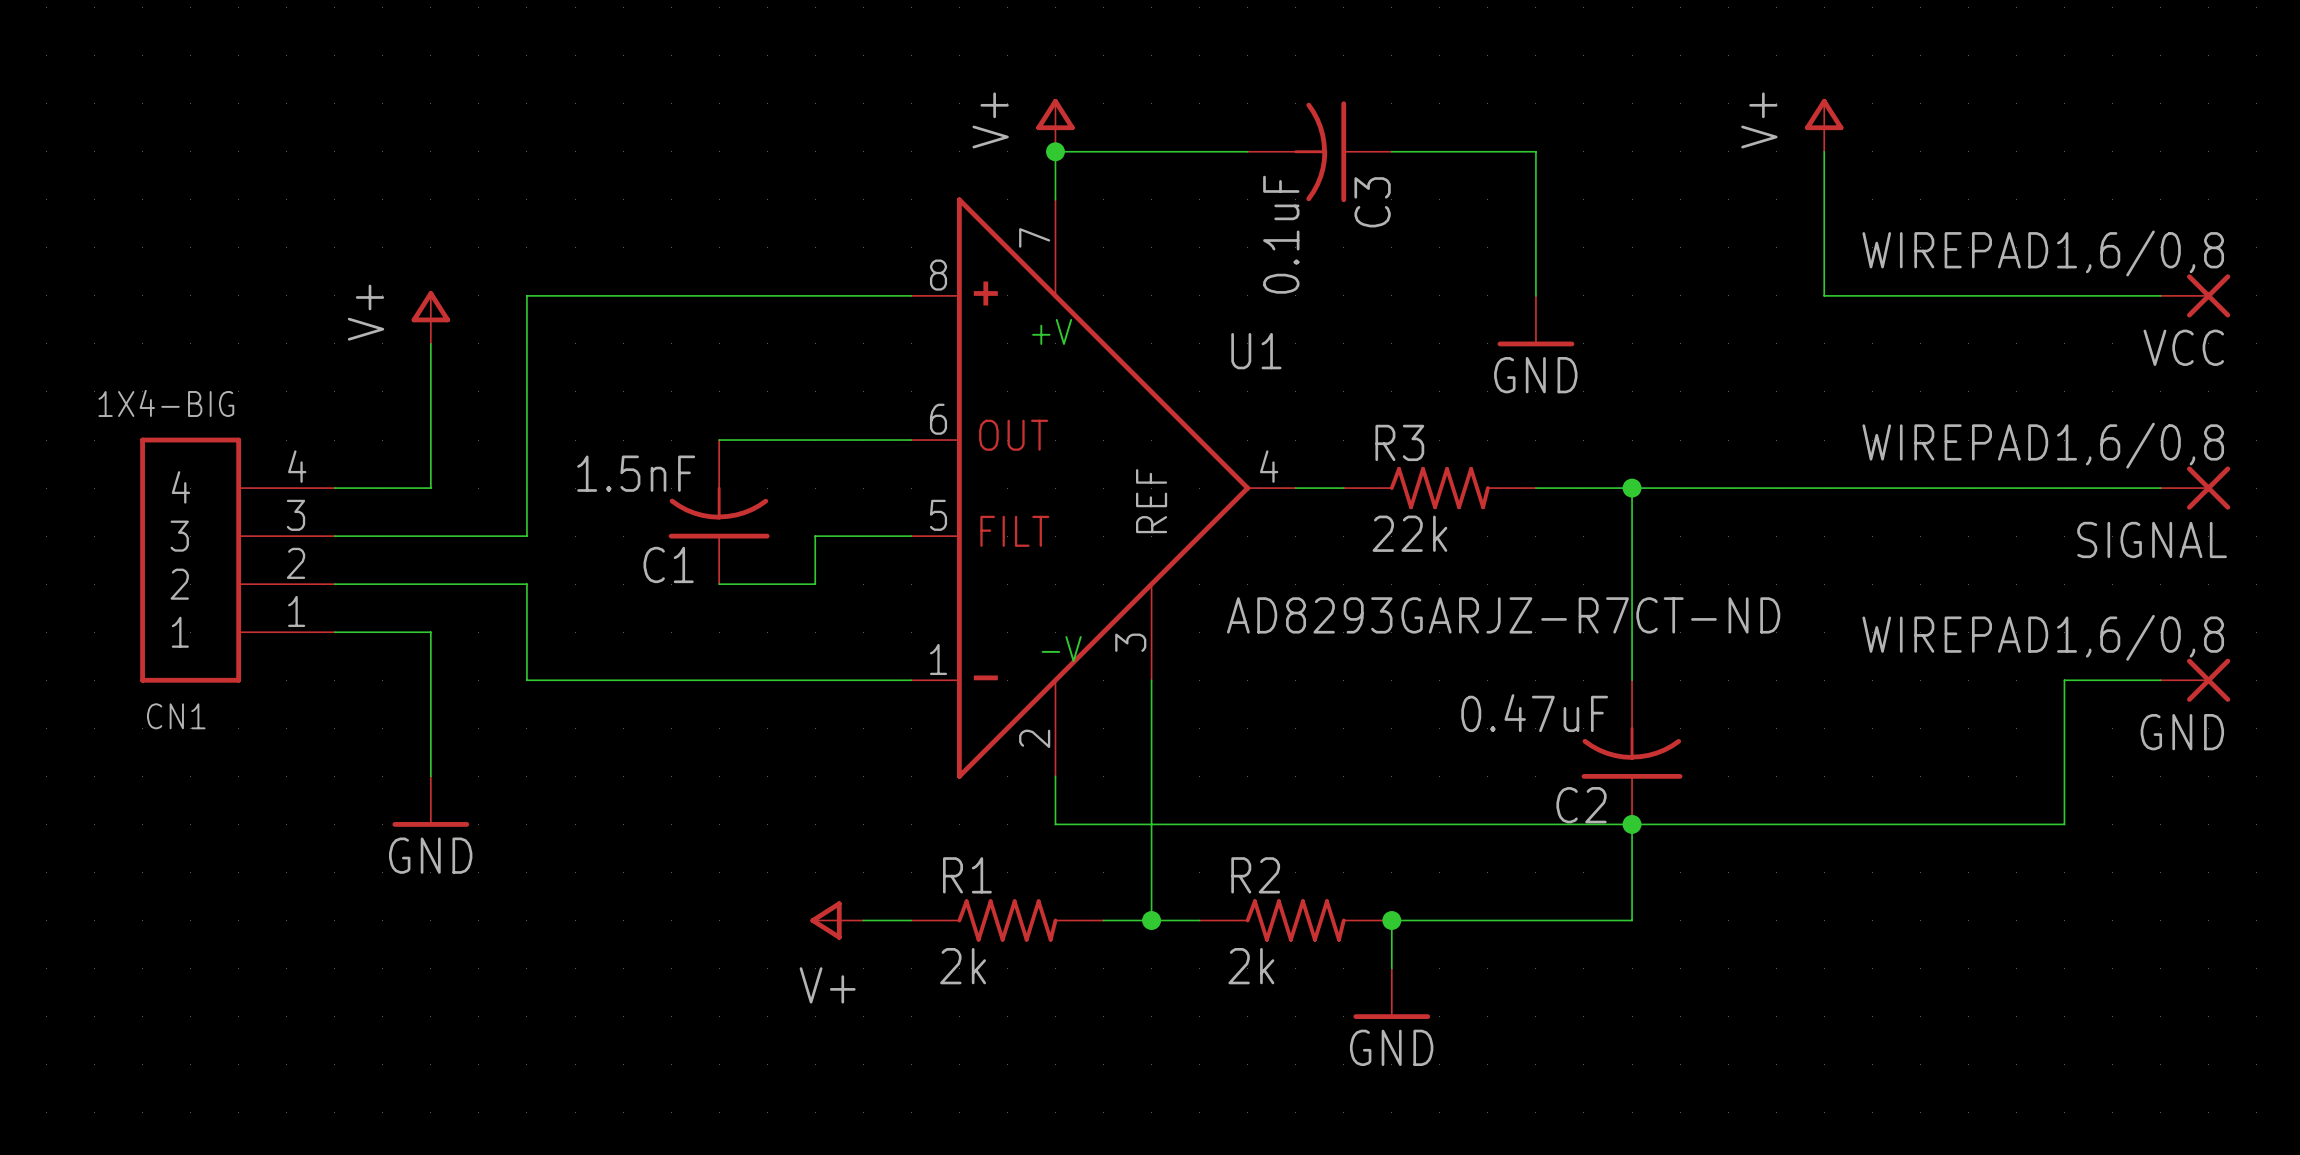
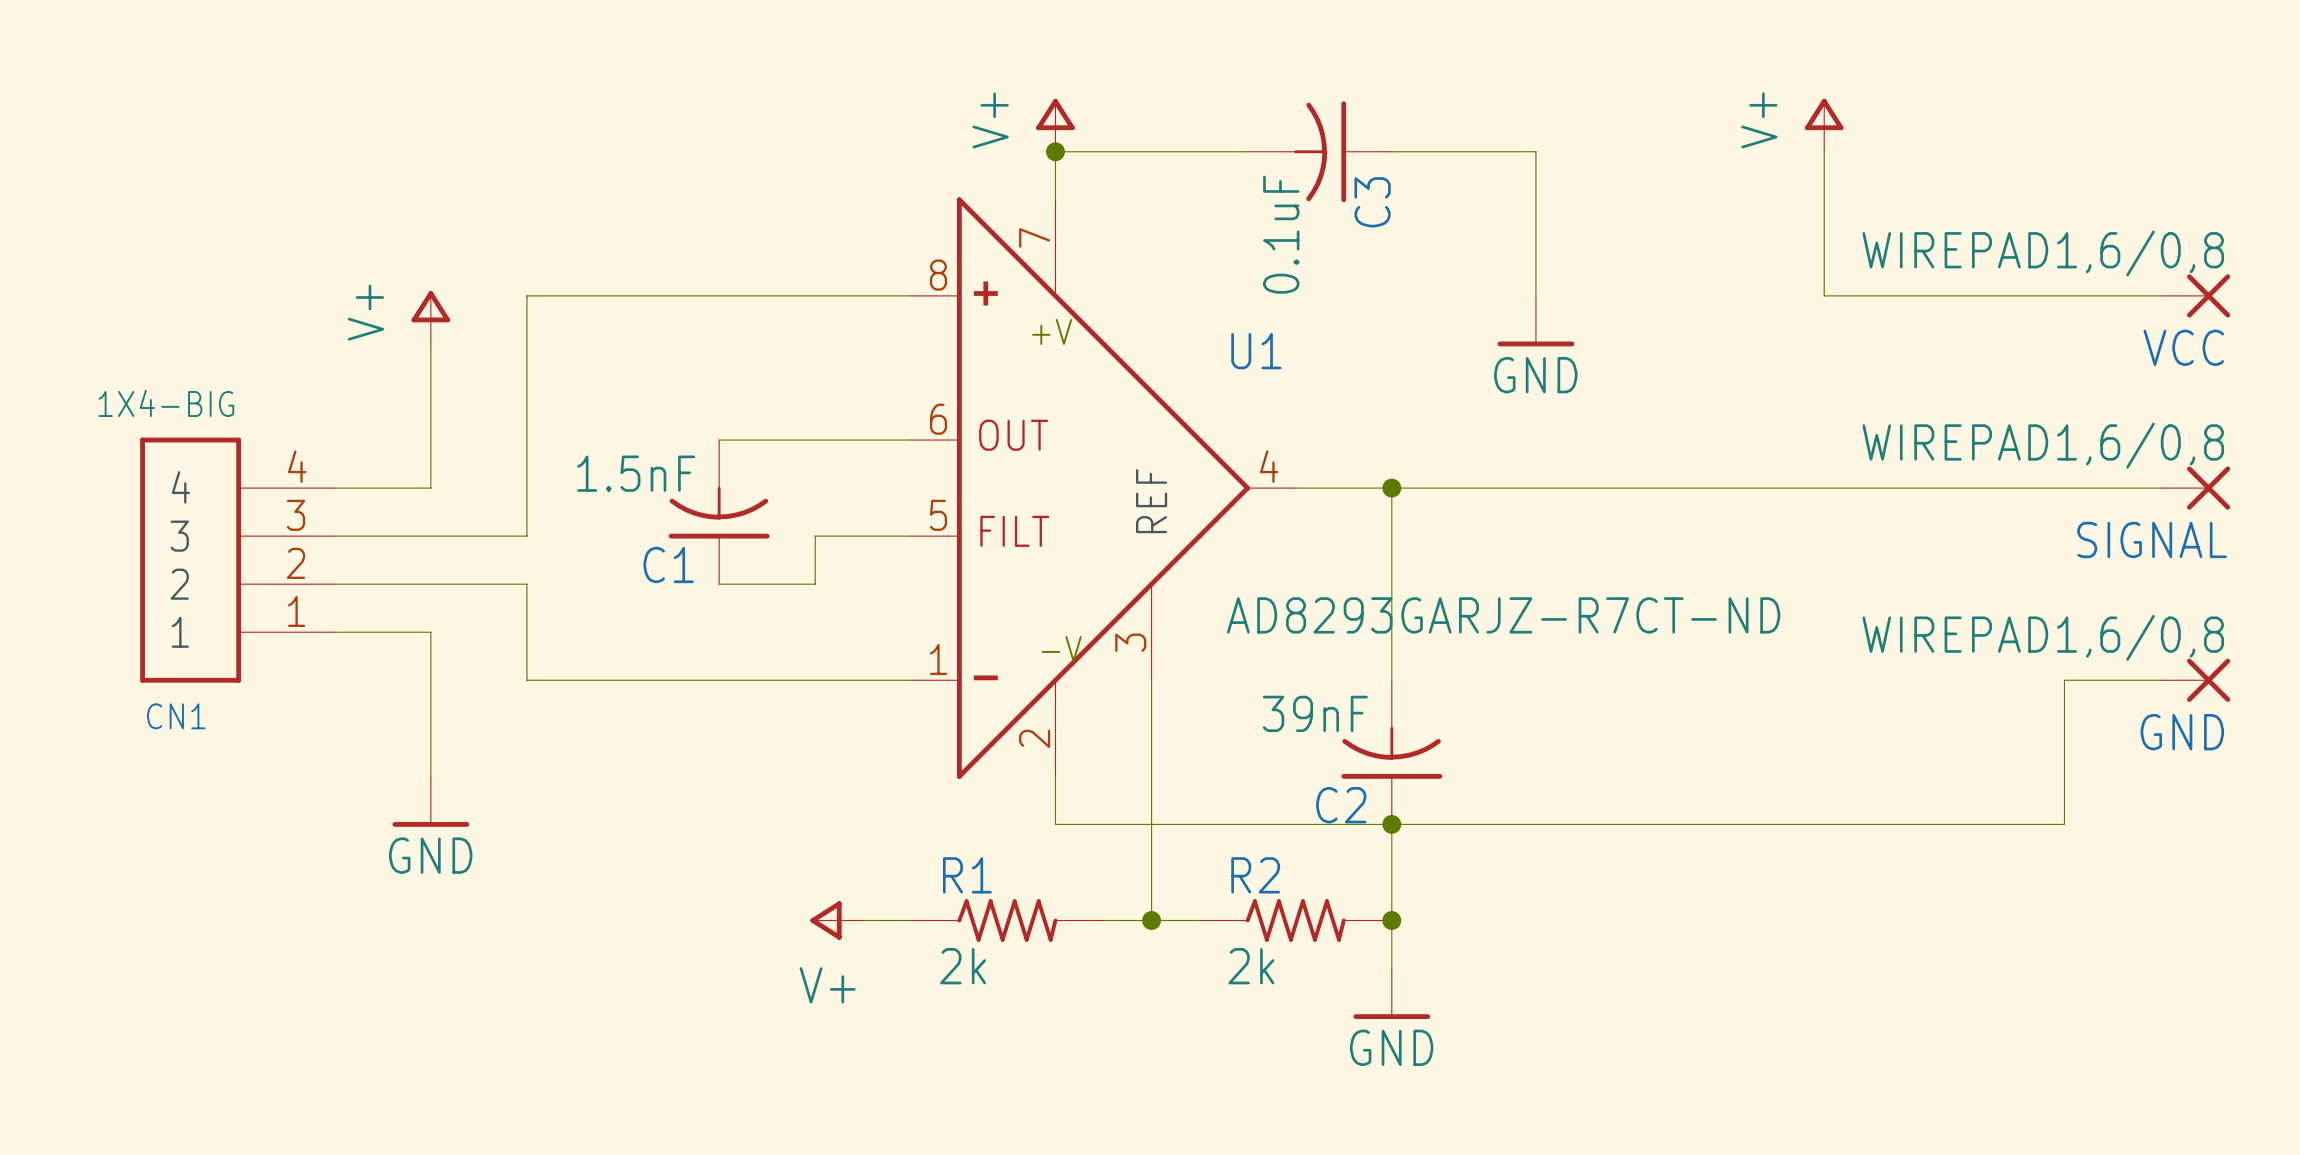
junction: none -> (1391, 488)
R3: 22k (1439, 488) -> none
wire: (1632, 488) (1632, 680) -> (1391, 488) (1391, 680)
junction: (1632, 488) -> none
C2 value: 0.47uF (1534, 713) -> 39nF (1315, 713)
C2 position: (1632, 752) -> (1391, 752)
junction: none -> (1391, 824)
wire: (1632, 824) (1632, 920) (1391, 920) -> (1391, 824) (1391, 920)
junction: (1632, 824) -> none

